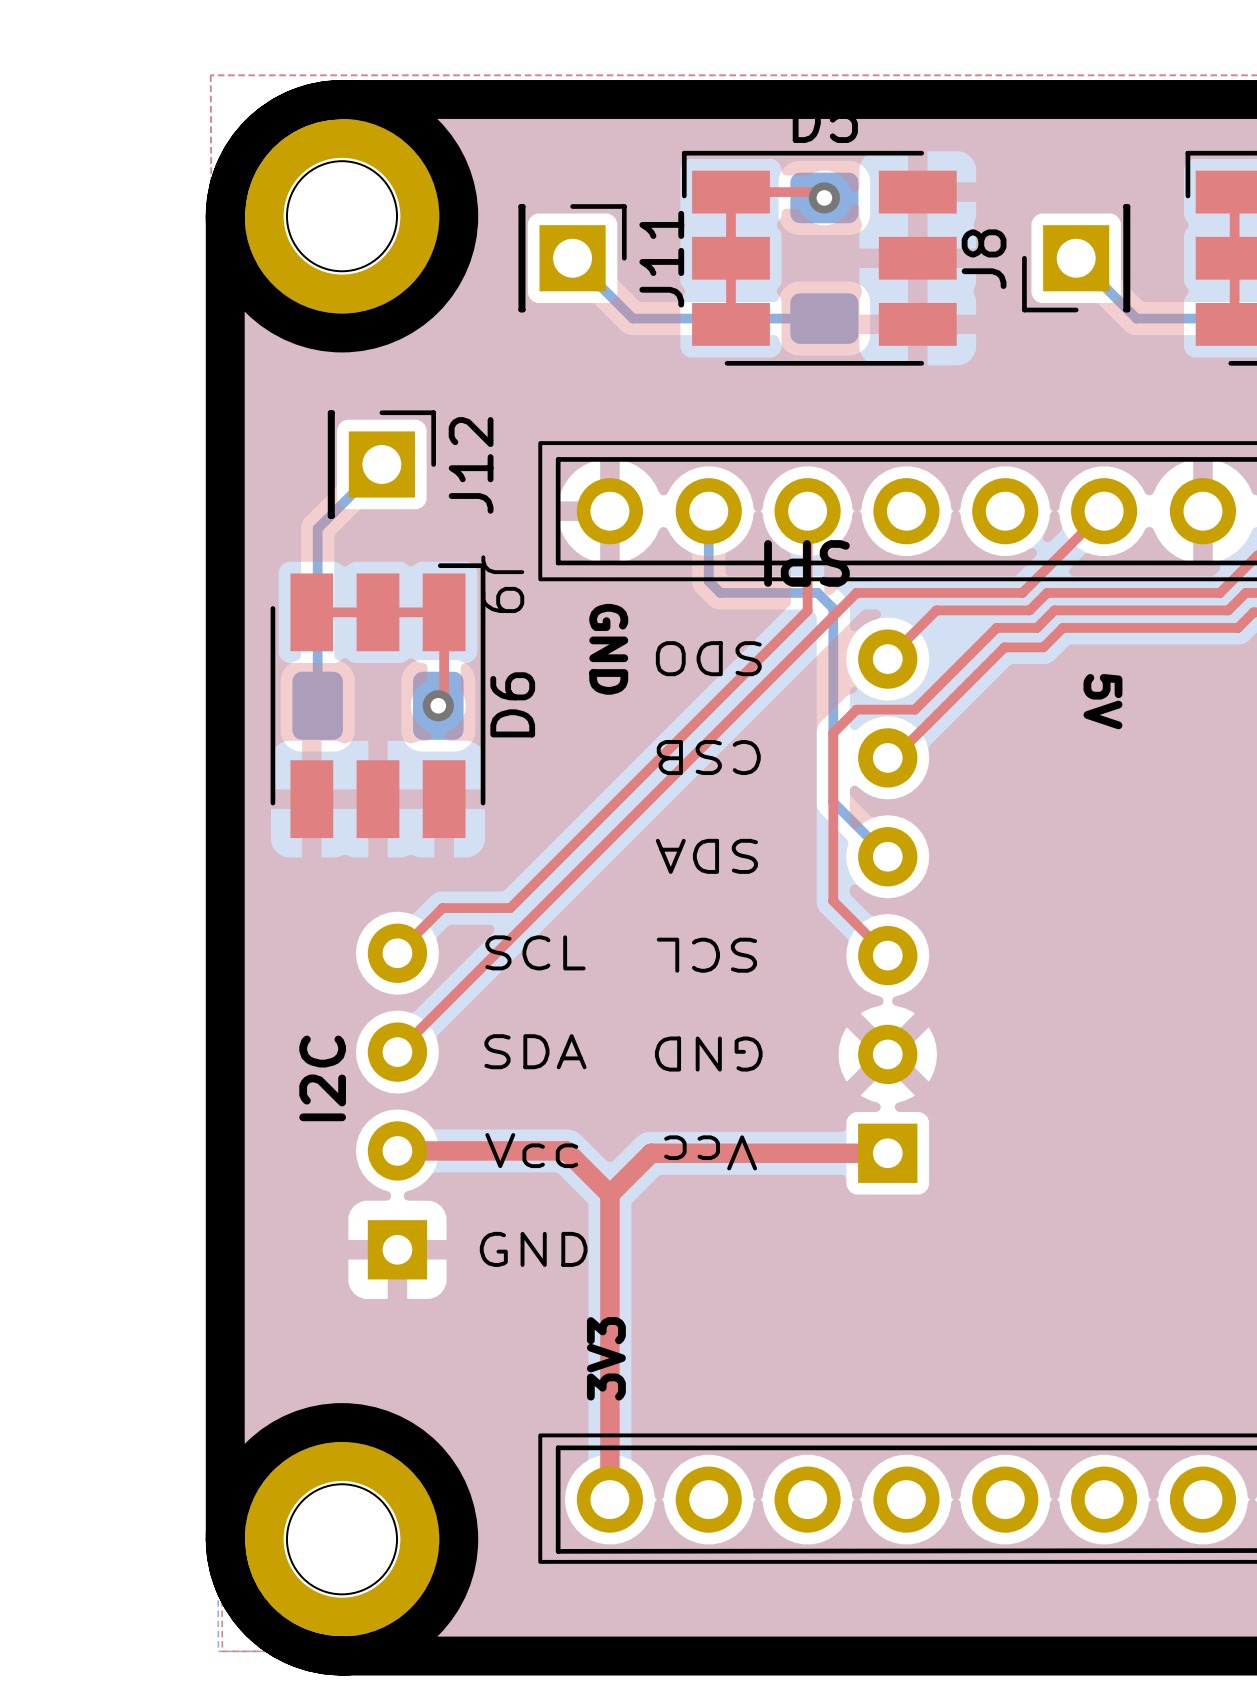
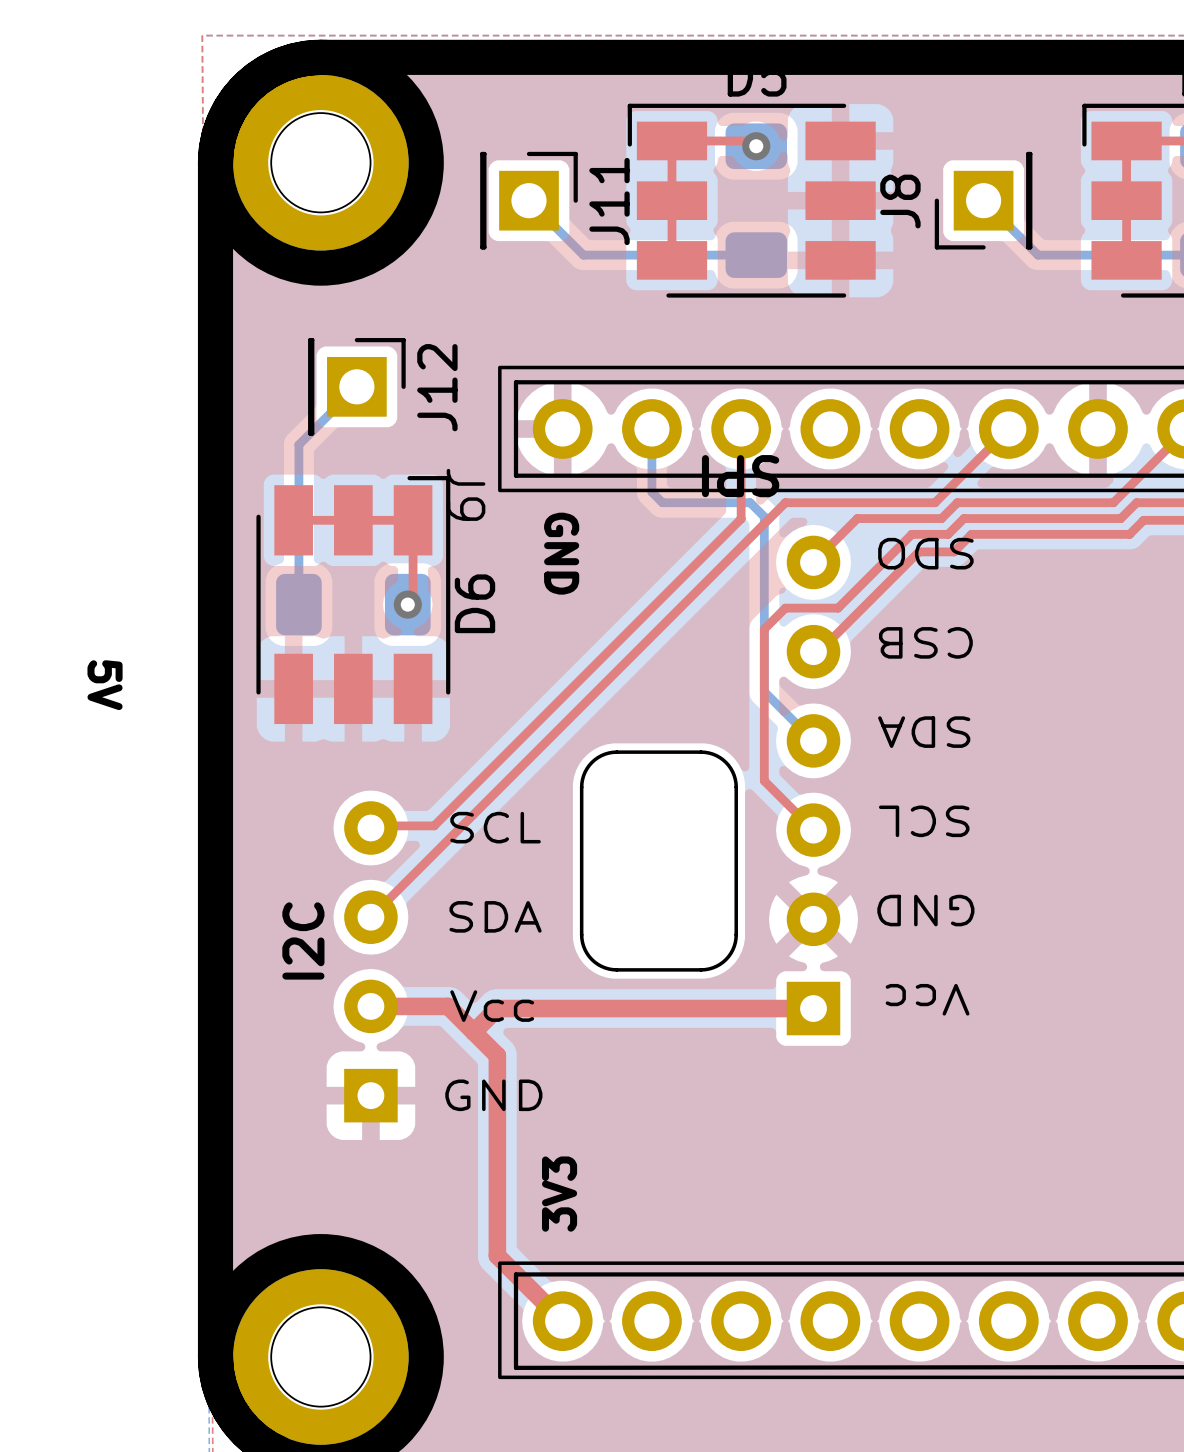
part text position: SDO (708, 658) -> SDO (925, 553)
J9 text position: 5V (1102, 701) -> 5V (105, 685)
part text position: CSB (708, 757) -> CSB (925, 642)
part text position: SDA (706, 856) -> SDA (924, 732)
board edge: none -> (616, 752) (708, 753) (722, 759) (732, 772) (736, 787) (736, 938) (728, 956) (716, 966) (701, 969) (612, 969) (598, 964) (585, 950) (581, 934) (581, 783) (585, 772) (591, 762) (601, 755) (616, 752)
top track: (510, 908) (442, 908) (399, 950) -> (472, 787) (434, 825) (373, 825)
part text position: SCL (706, 955) -> SCL (924, 821)
part text position: GND (708, 1054) -> GND (925, 910)
top track: (483, 1150) (566, 1150) (609, 1194) -> none
part text position: Vcc (710, 1152) -> Vcc (927, 999)
top track: (651, 1153) (609, 1194) -> (599, 1008) (497, 1008) (473, 1032)
top track: (609, 1194) (609, 1499) -> (448, 1006) (497, 1055) (497, 1255) (562, 1321)

